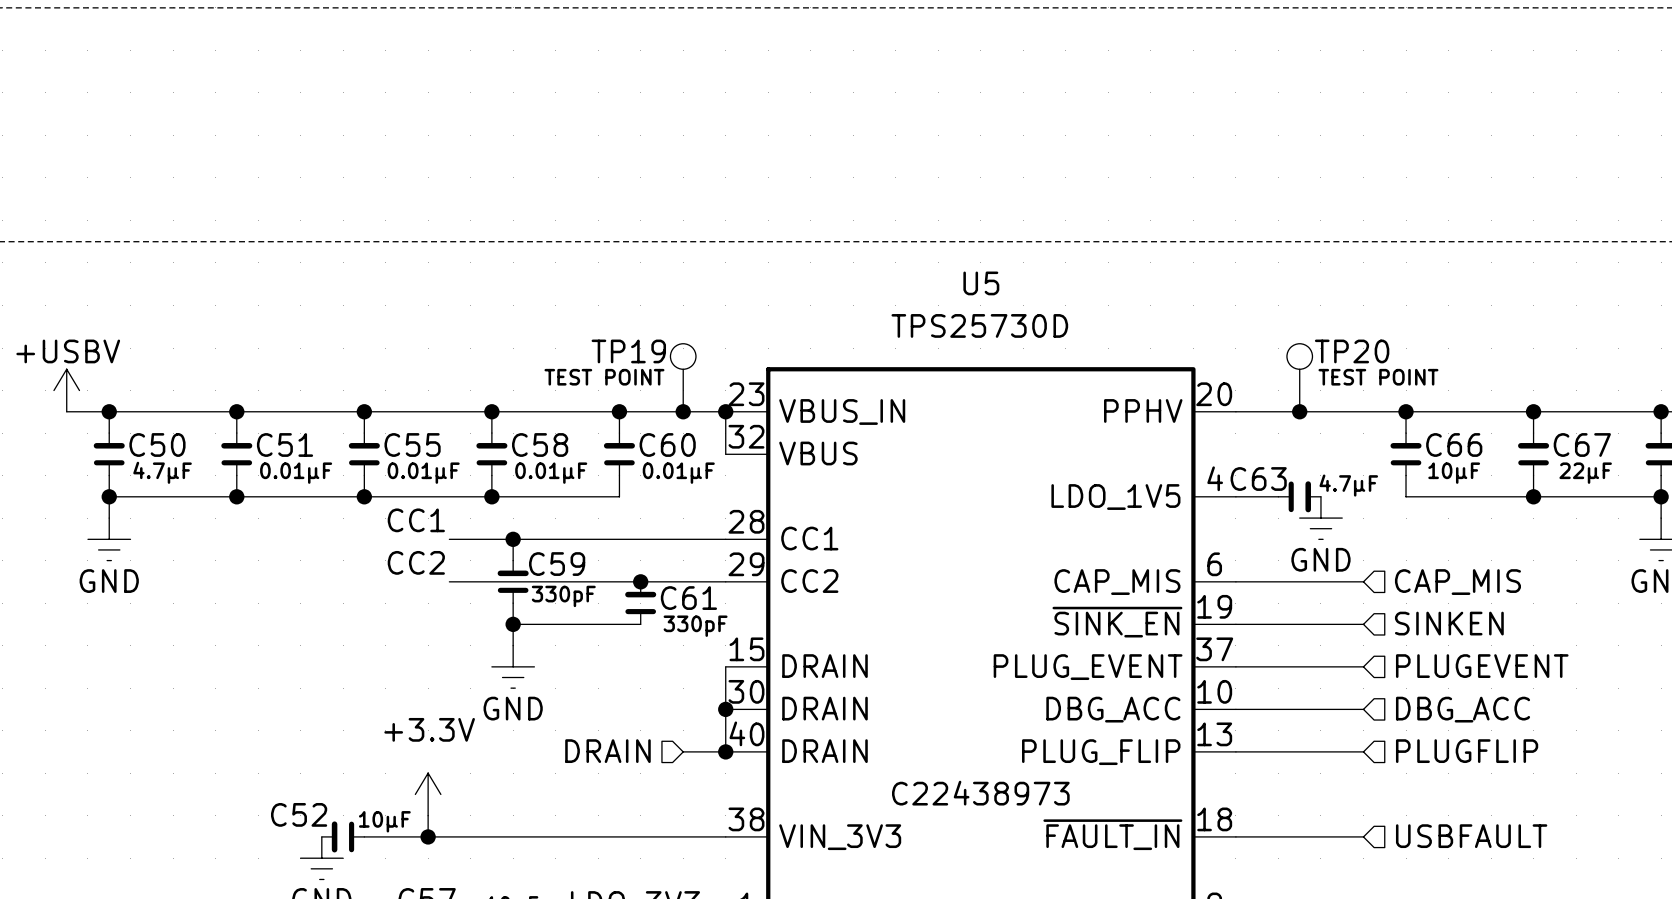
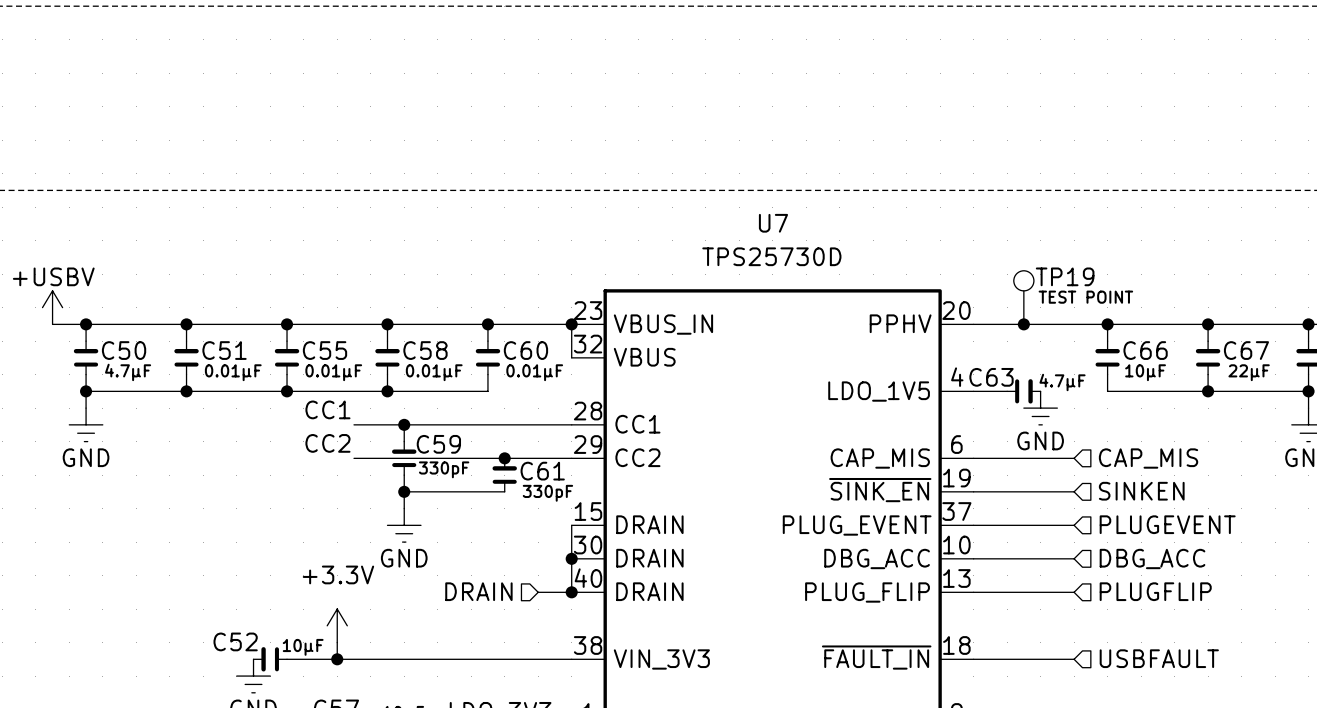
U5 name: U5 (981, 283) -> U7 (773, 223)
TP20 name: TP20 (1352, 351) -> TP19 (1065, 276)
TP19: TEST POINT (683, 377) -> none
junction: (683, 411) -> none
U5 text: C22438973 (980, 793) -> none

